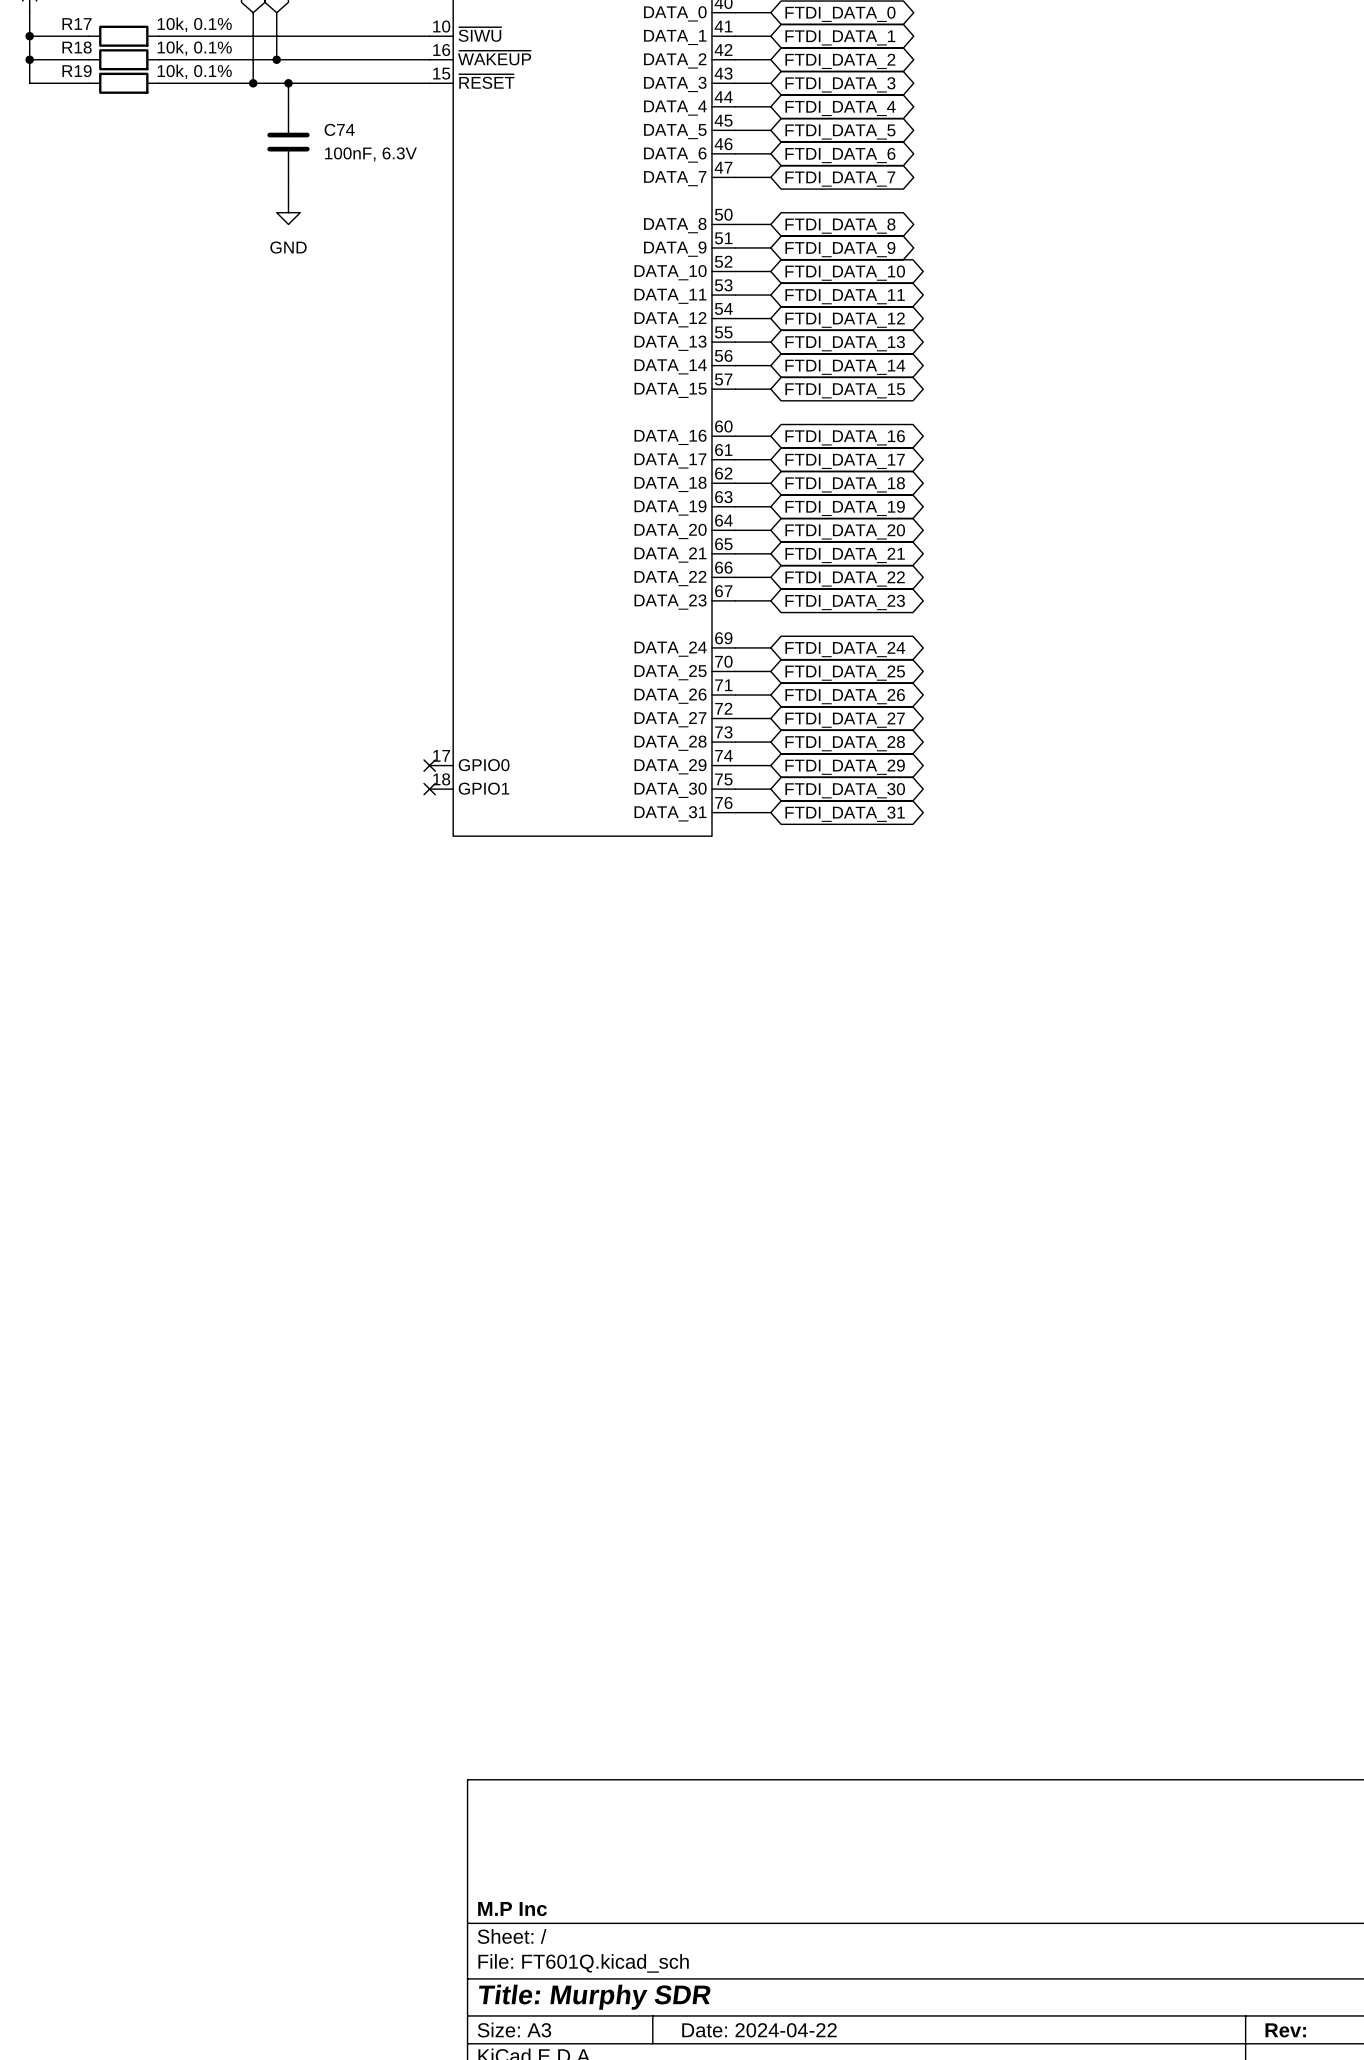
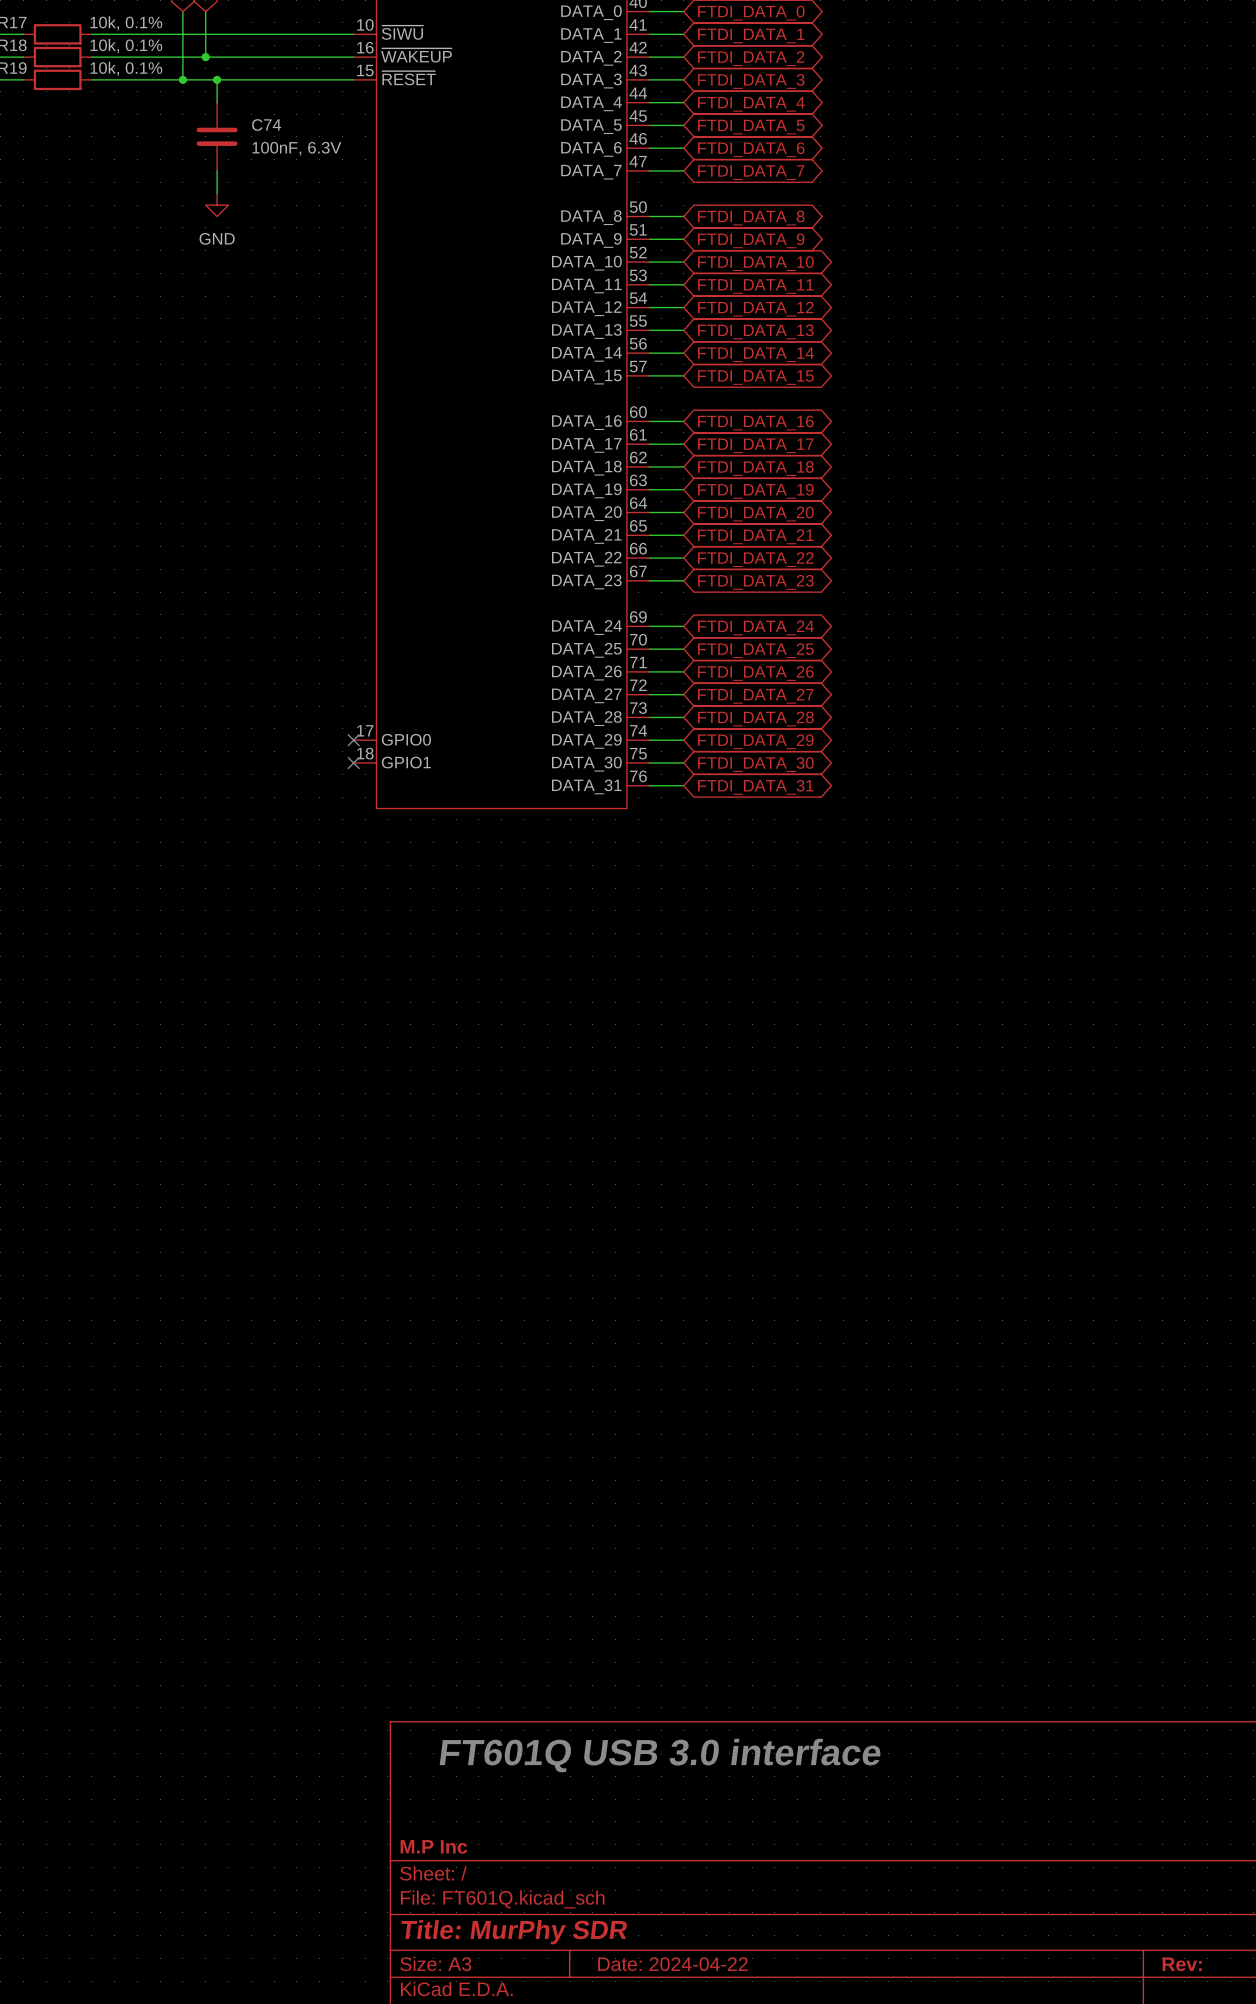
text: none -> FT601Q USB 3.0 interface (660, 1755)
title block: Title: Murphy SDR (594, 1997) -> Title: MurPhy SDR (514, 1932)

